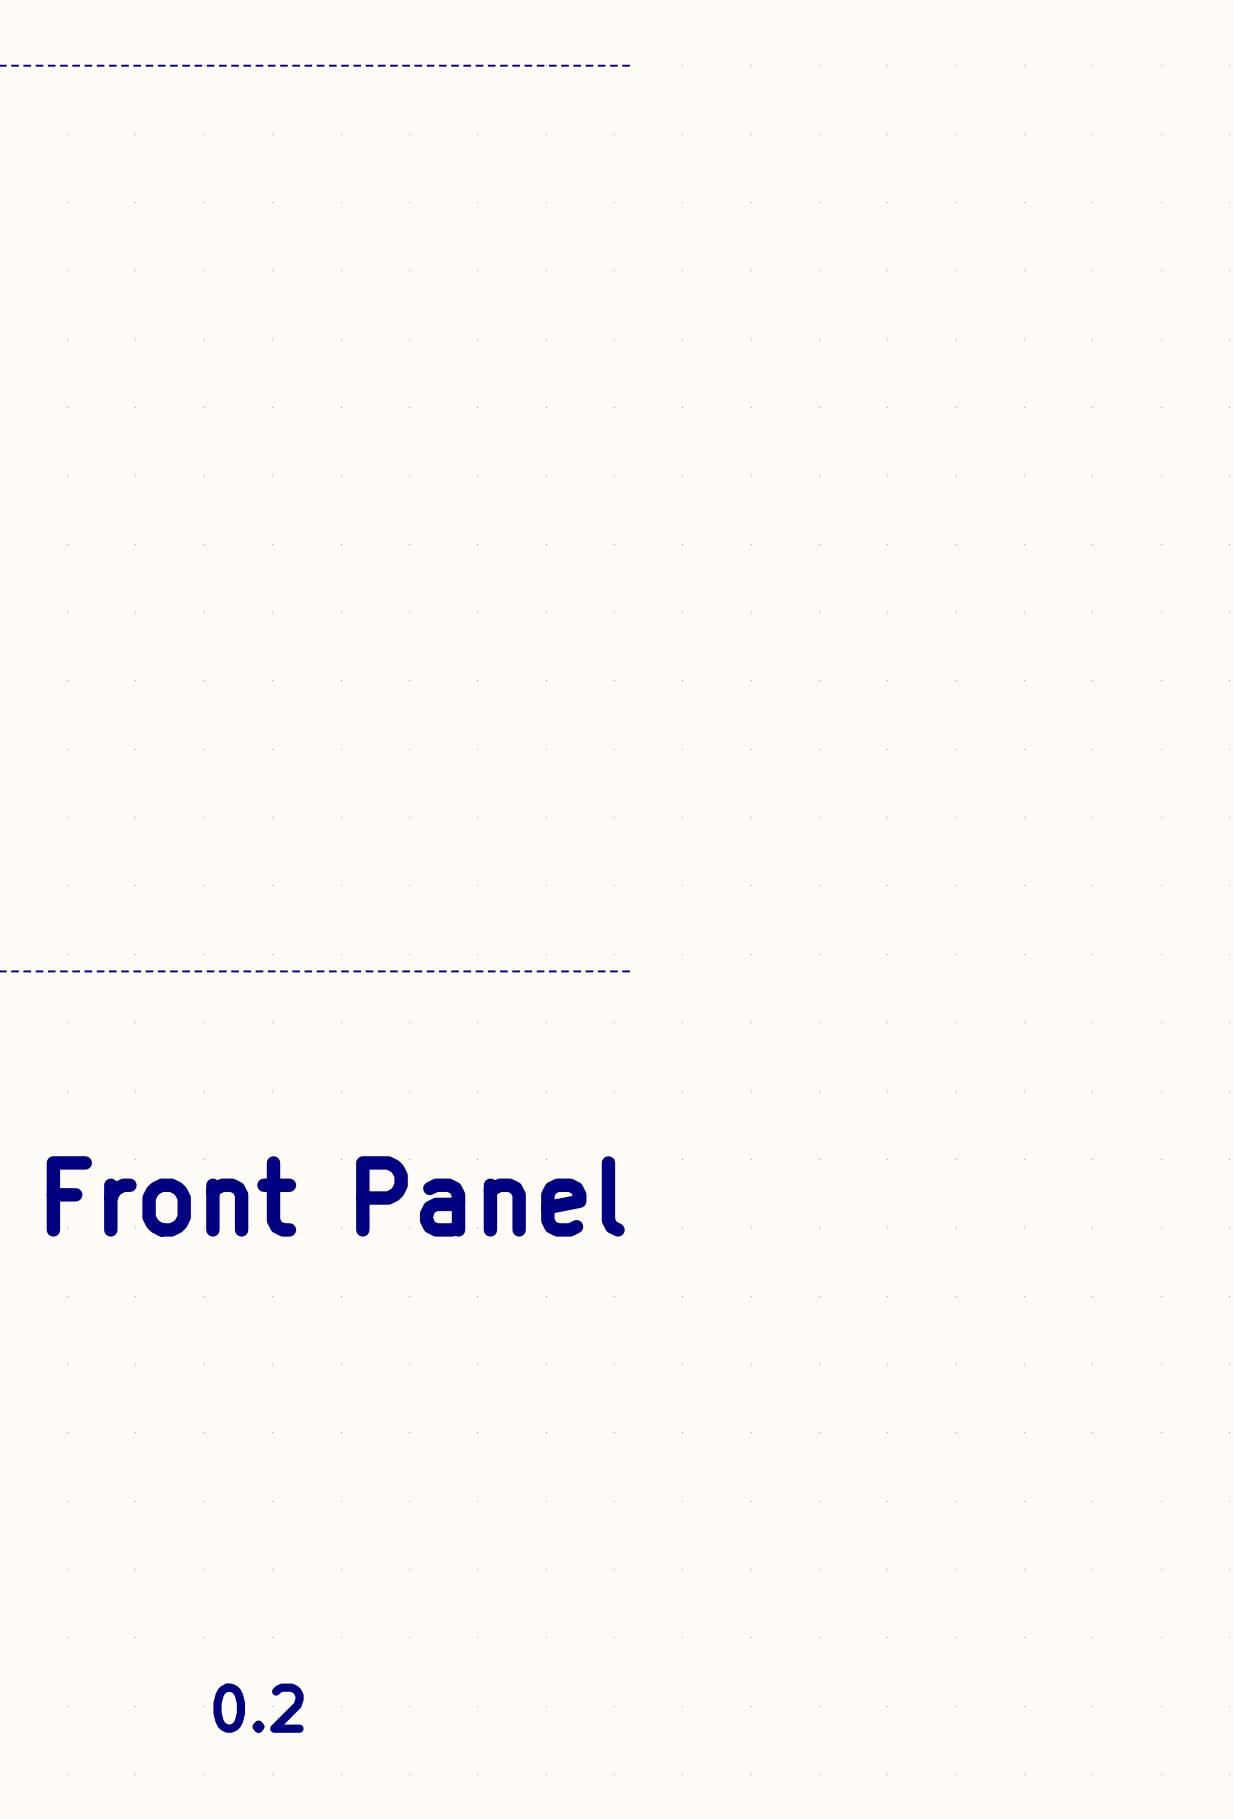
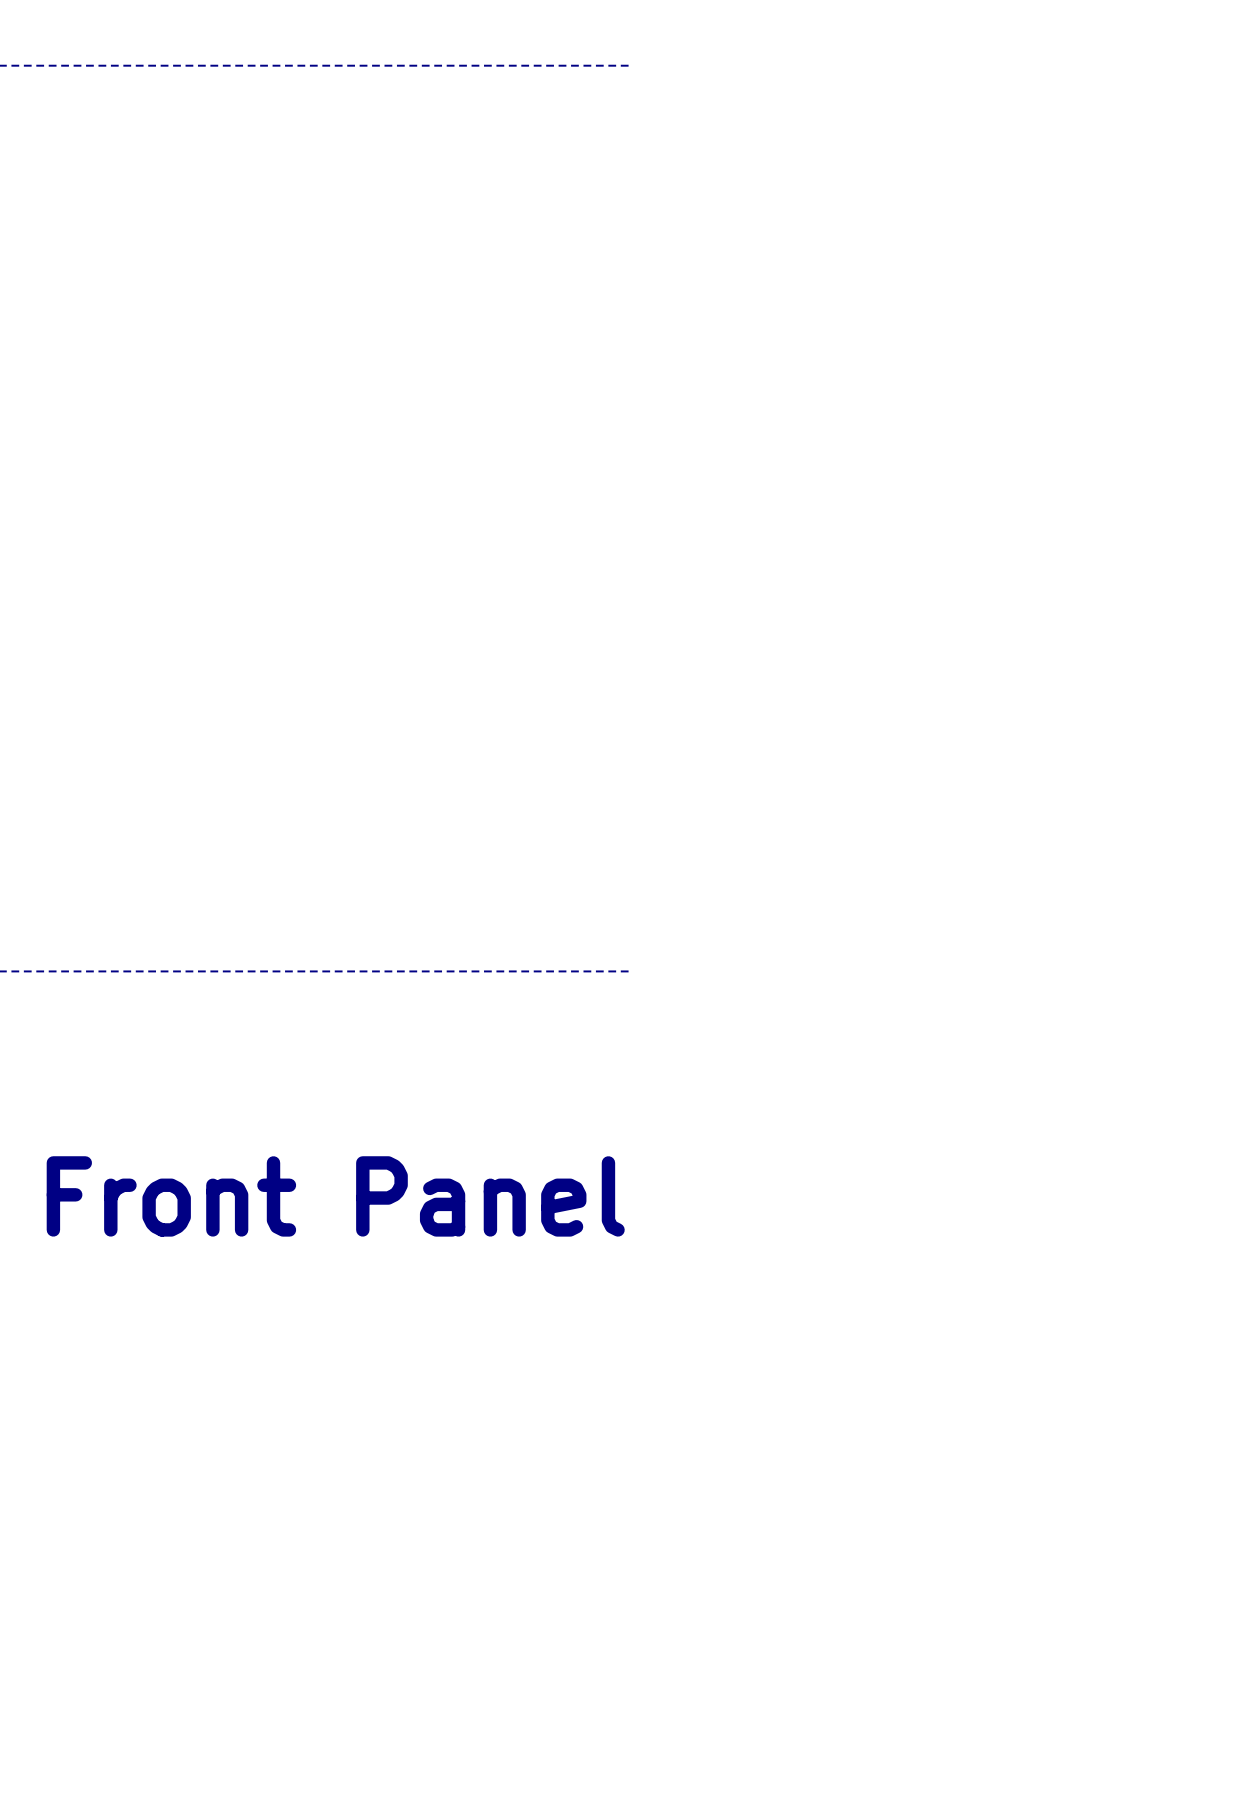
text: 0.2 (258, 1708) -> none

